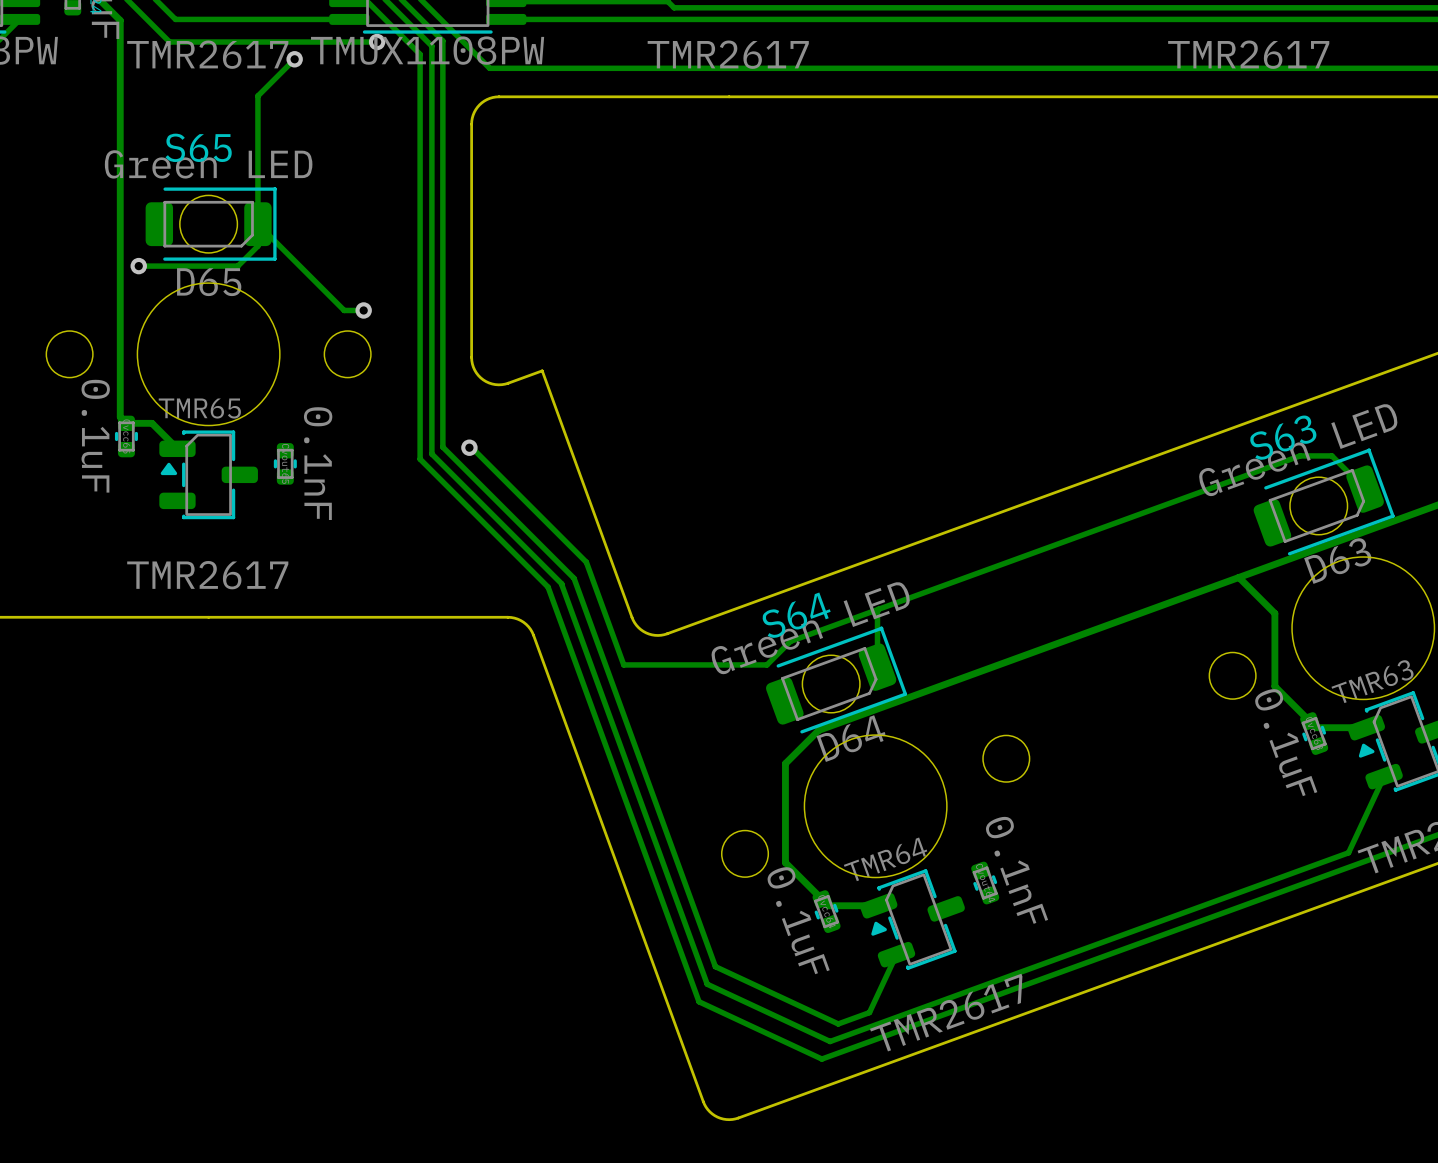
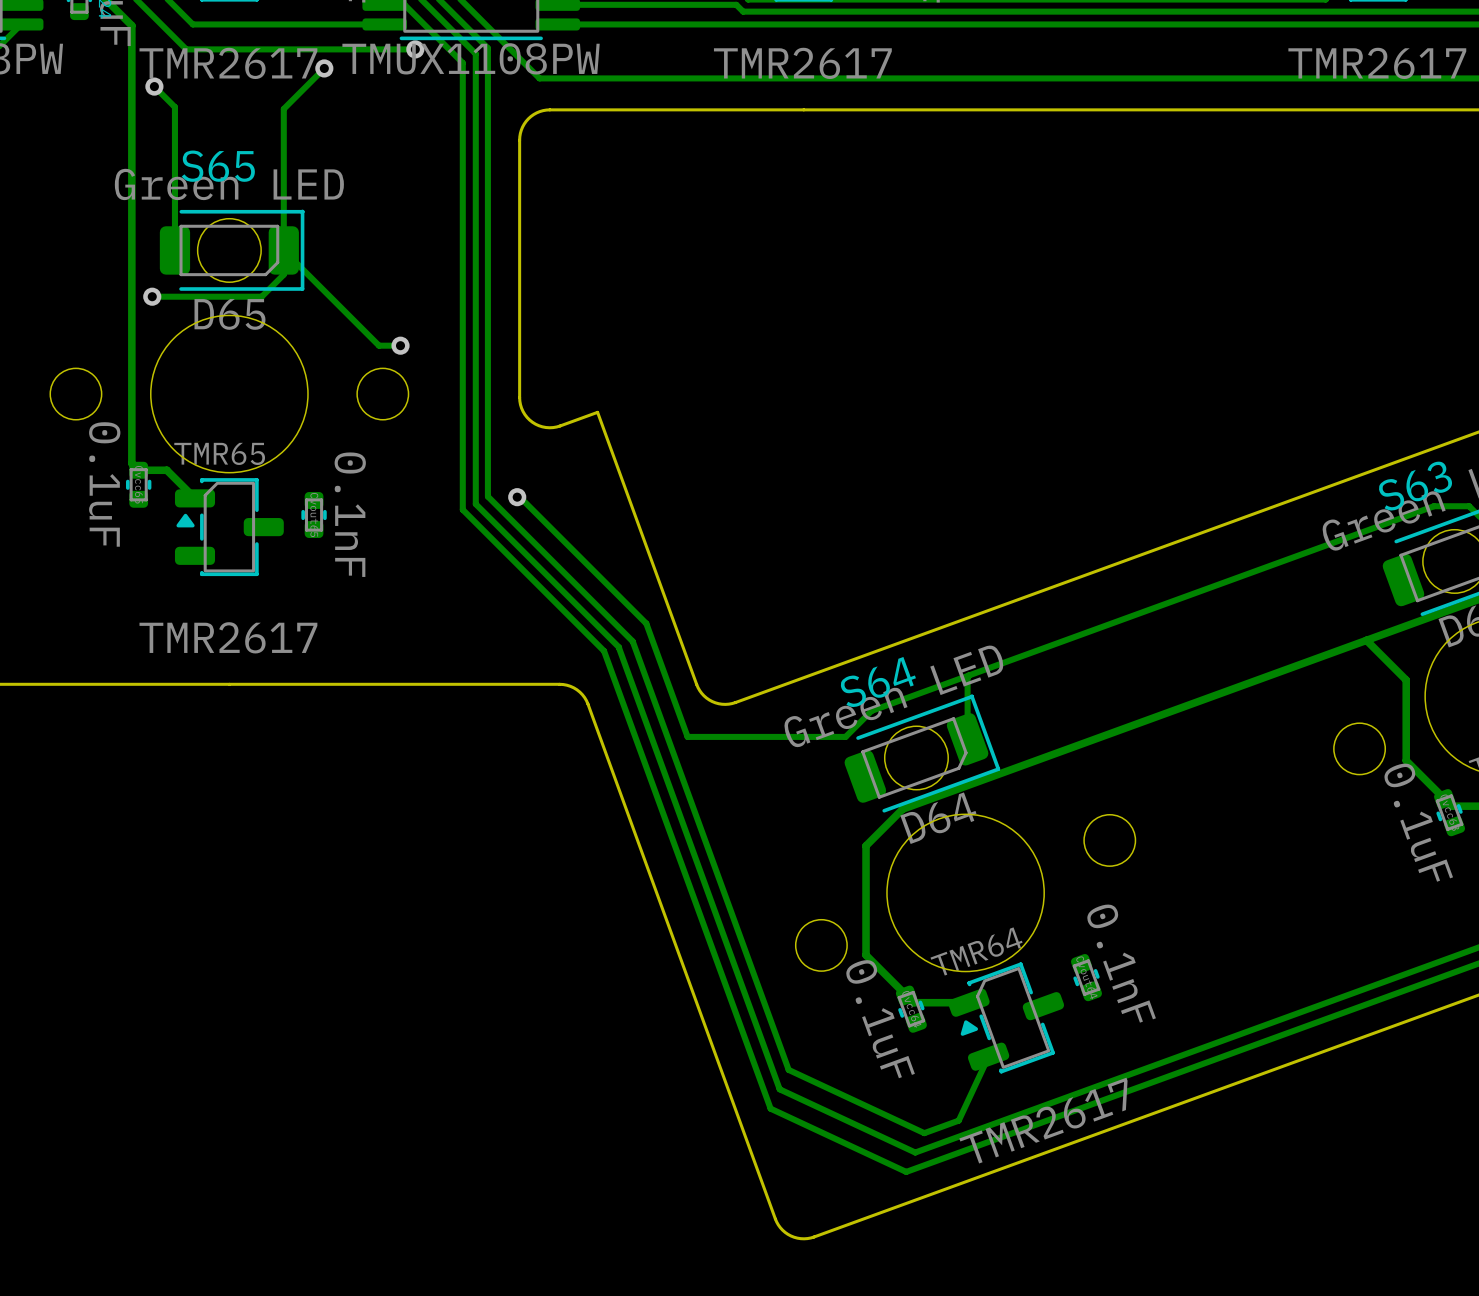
track: none -> (154, 86) (174, 107) (174, 250)
via: none -> (154, 86)

